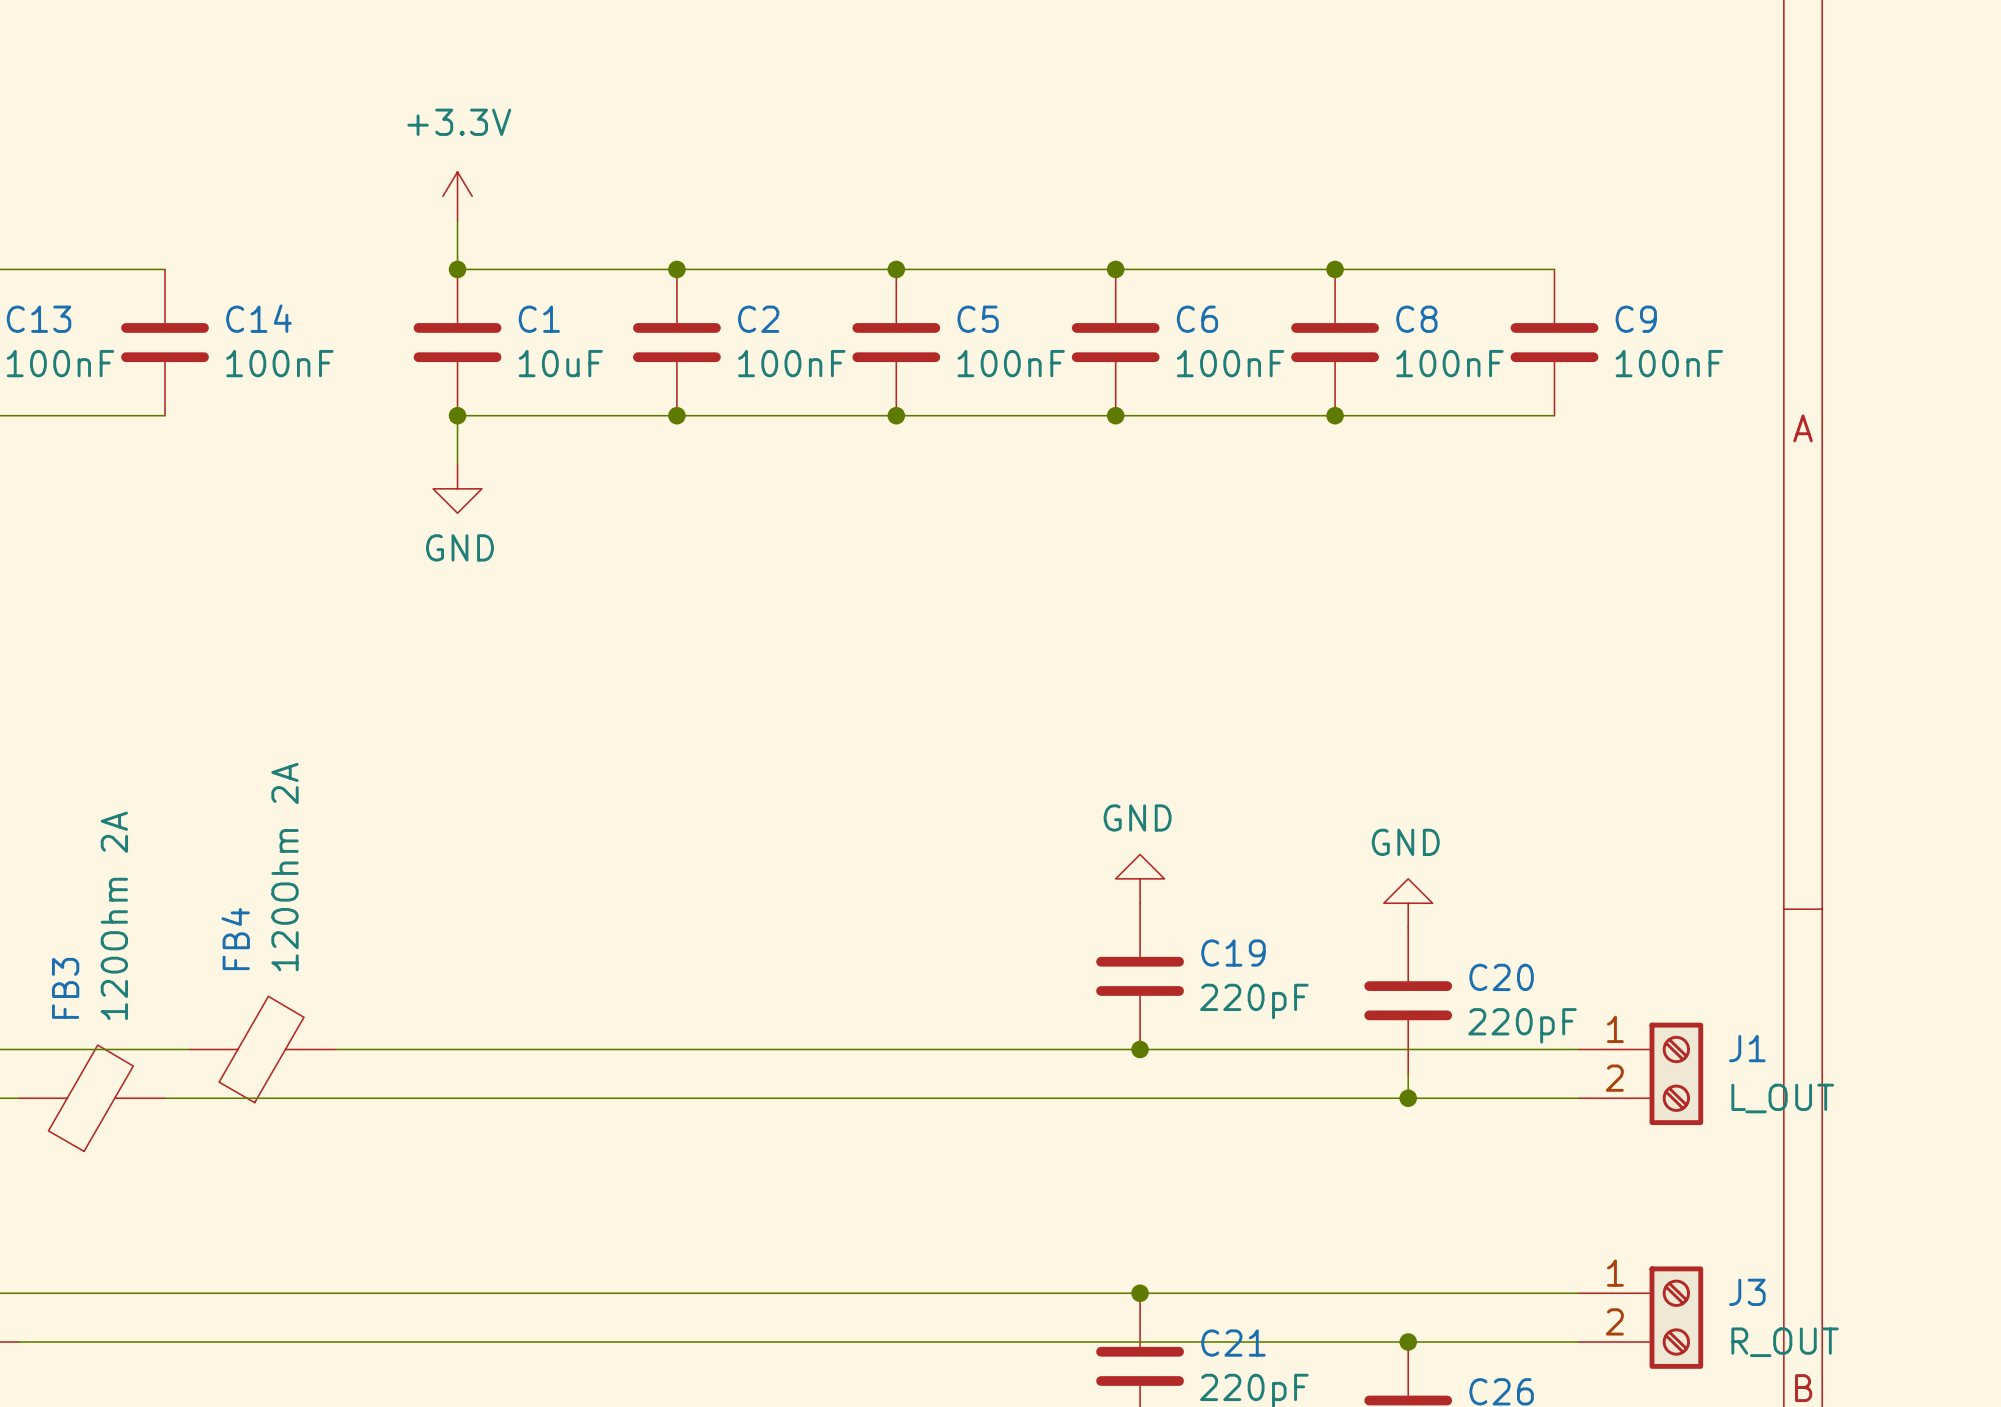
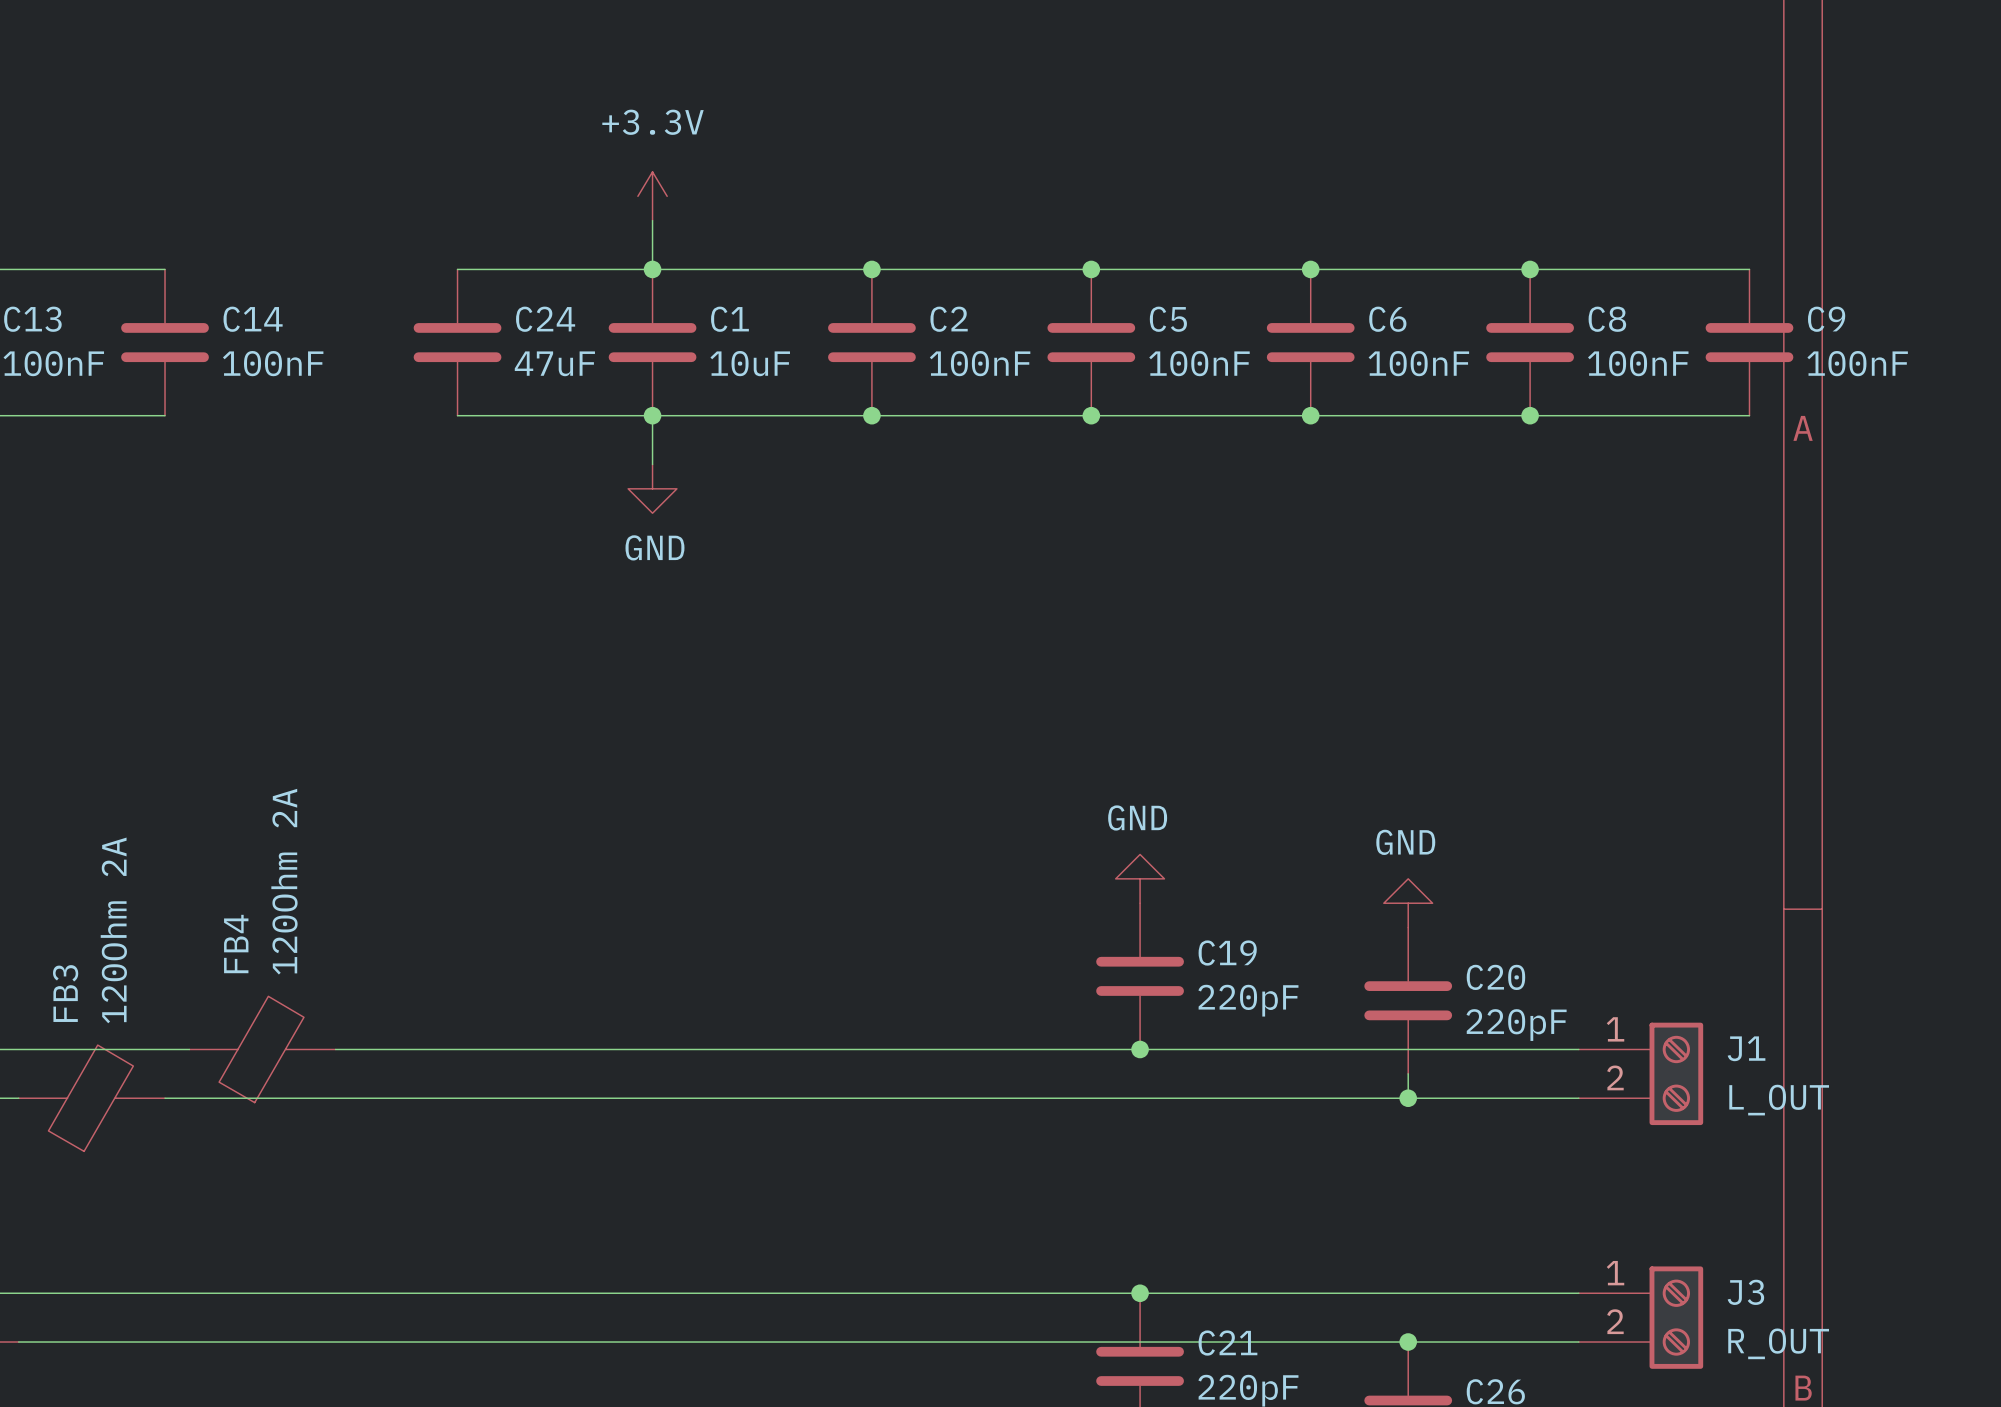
power symbol position: +3.3V (457, 196) -> +3.3V (652, 196)
wire: (457, 220) (457, 269) -> (652, 220) (652, 269)
junction: (457, 269) -> none
junction position: (676, 269) -> (652, 269)
junction position: (896, 269) -> (871, 269)
junction position: (1115, 269) -> (1091, 269)
junction position: (1335, 269) -> (1310, 269)
junction: none -> (1530, 269)
wire: none -> (1554, 269) (1749, 269)
C1 name: C1 (539, 319) -> C24 (545, 319)
C1: none -> 10uF (652, 342)
C2 position: (676, 342) -> (871, 342)
C5 position: (896, 342) -> (1091, 342)
C6 position: (1115, 342) -> (1310, 342)
C8 position: (1335, 342) -> (1530, 342)
C9 position: (1554, 342) -> (1749, 342)
C1 value: 10uF (560, 363) -> 47uF (554, 363)
wire: (457, 415) (457, 464) -> (652, 415) (652, 464)
junction: (457, 415) -> none
junction position: (676, 415) -> (652, 415)
junction position: (896, 415) -> (871, 415)
junction position: (1115, 415) -> (1091, 415)
junction position: (1335, 415) -> (1310, 415)
junction: none -> (1530, 415)
wire: none -> (1554, 415) (1749, 415)
power symbol position: GND (457, 488) -> GND (652, 488)

